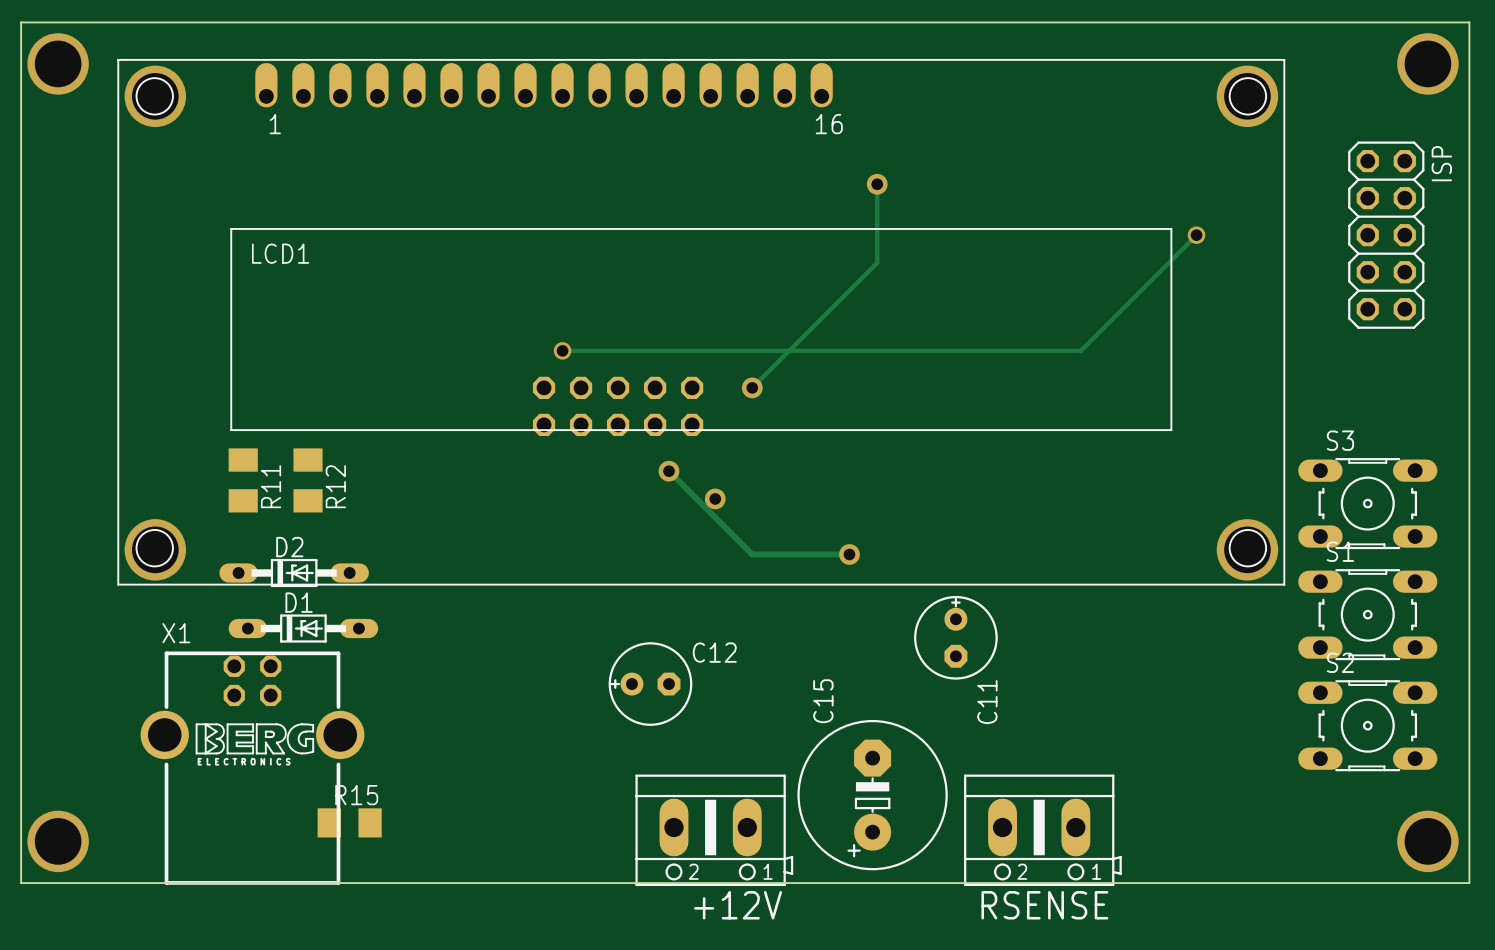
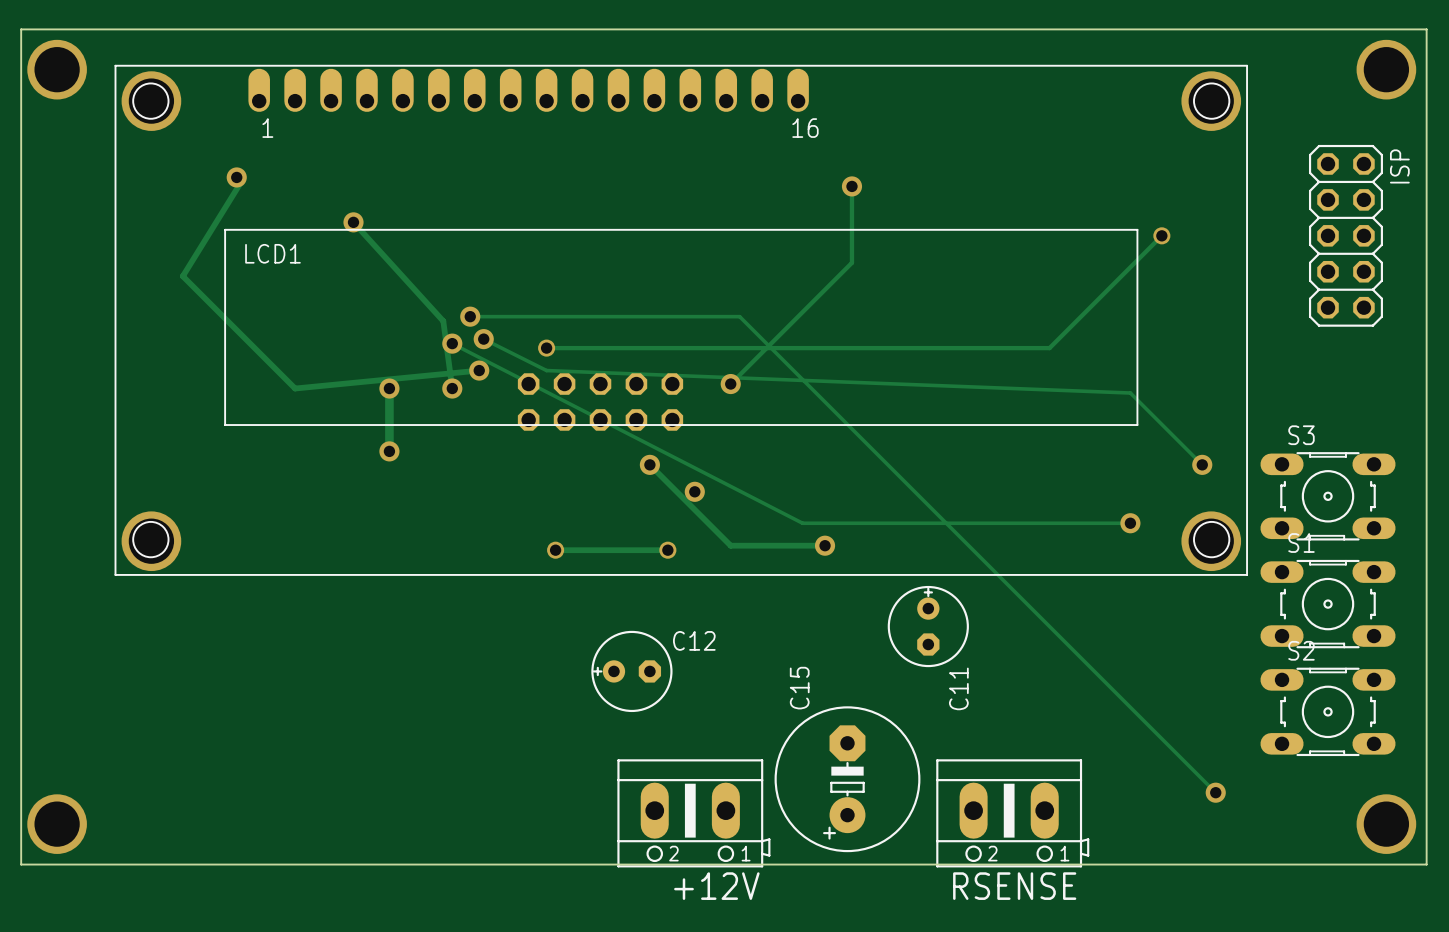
track: none -> (236, 177) (241, 181) (182, 276) (295, 388) (479, 370)
via: none -> (236, 177)
track: none -> (353, 222) (443, 321) (452, 388)
via: none -> (353, 222)
track: none -> (470, 316) (739, 316) (1215, 792)
via: none -> (470, 316)
track: none -> (483, 339) (546, 370) (1130, 393) (1202, 464)
via: none -> (483, 339)
track: none -> (452, 343) (802, 523) (1130, 523)
via: none -> (452, 343)
via: none -> (479, 370)
track: none -> (389, 388) (389, 451)
via: none -> (389, 388)
via: none -> (452, 388)
via: none -> (389, 451)
via: none -> (1202, 464)
R11: (243, 480) -> none
R12: (308, 480) -> none
via: none -> (1130, 523)
track: none -> (555, 550) (667, 550)
via: none -> (555, 550)
via: none -> (667, 550)
D2: (294, 572) -> none
D1: (303, 628) -> none
X1: (252, 768) -> none
via: none -> (1215, 792)
R15: (349, 822) -> none

